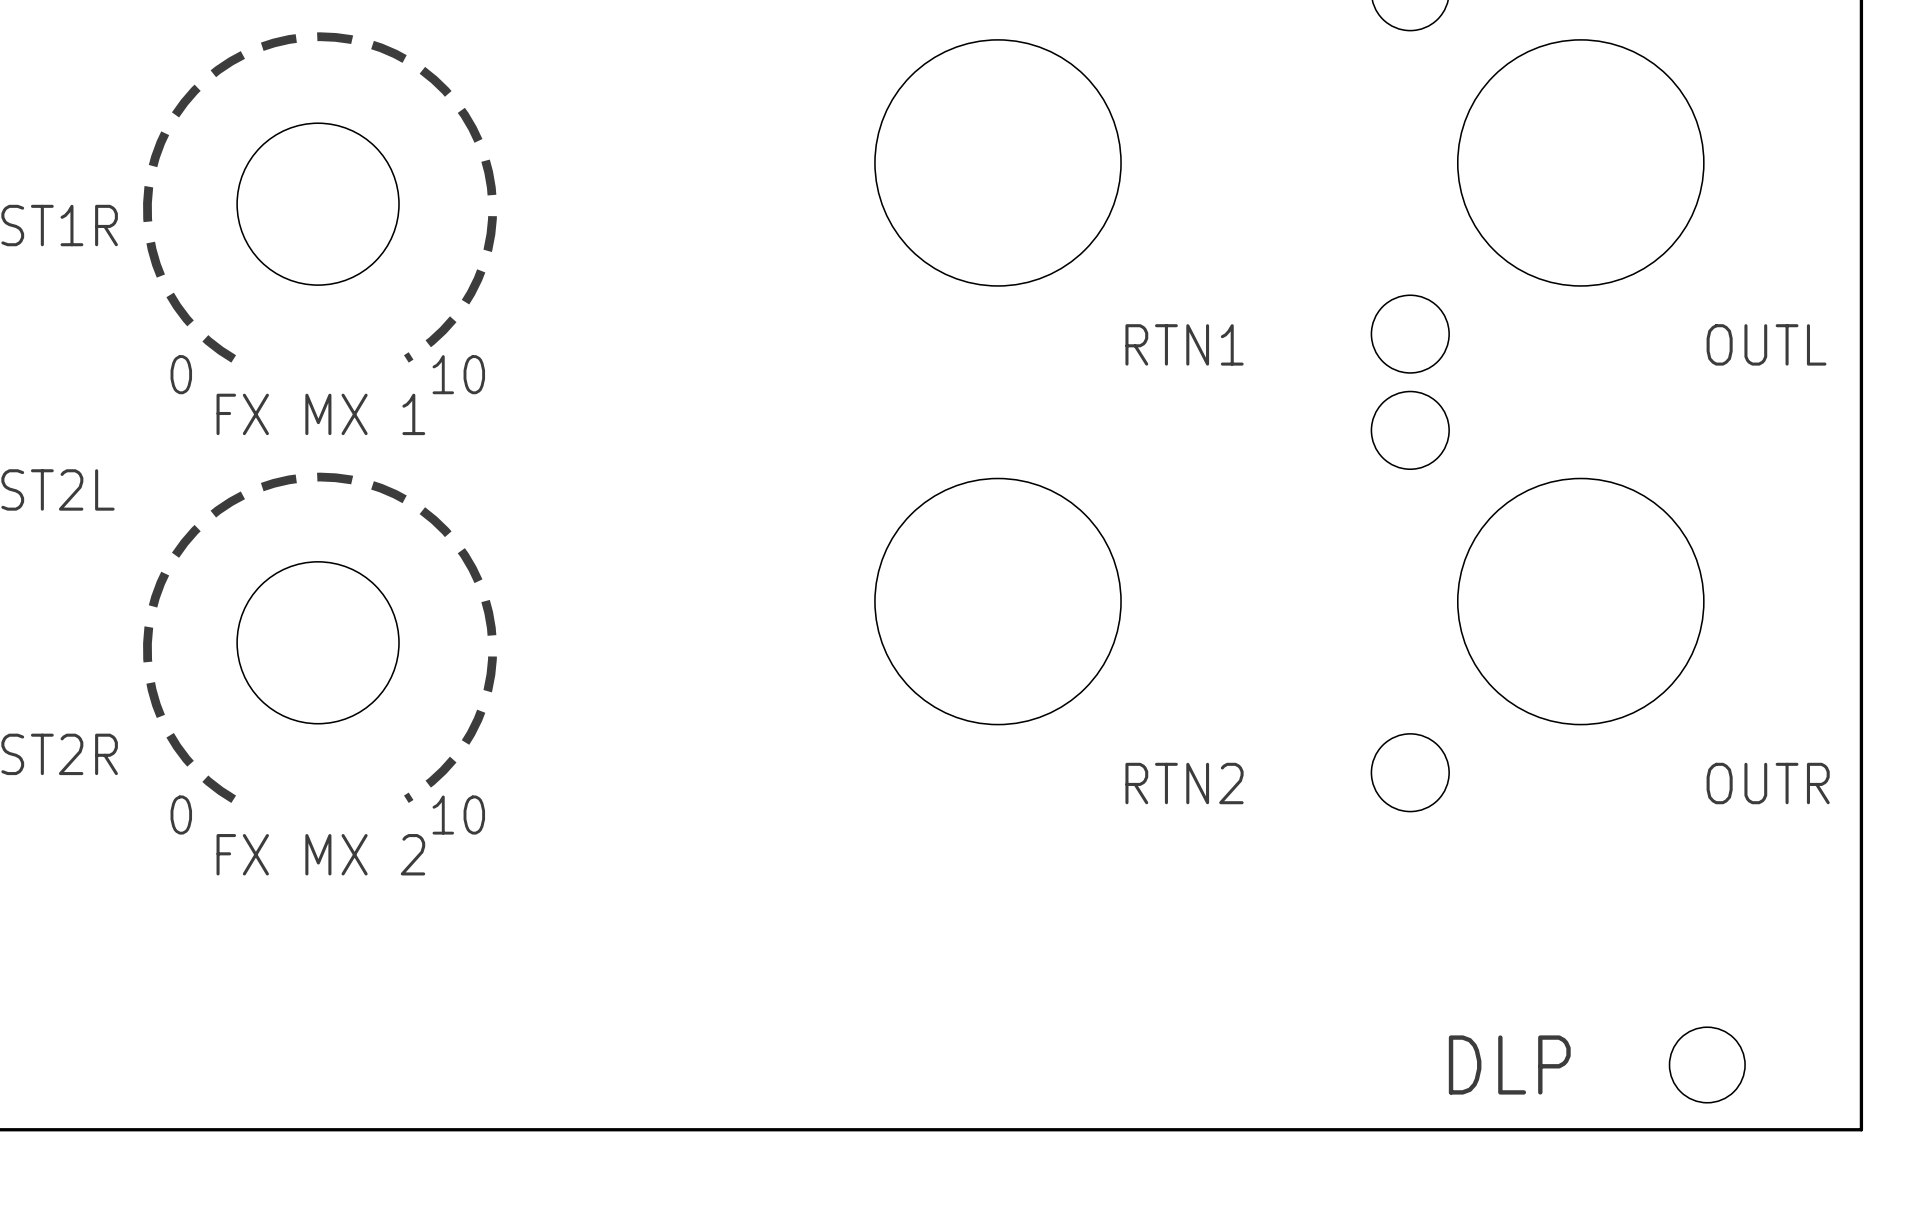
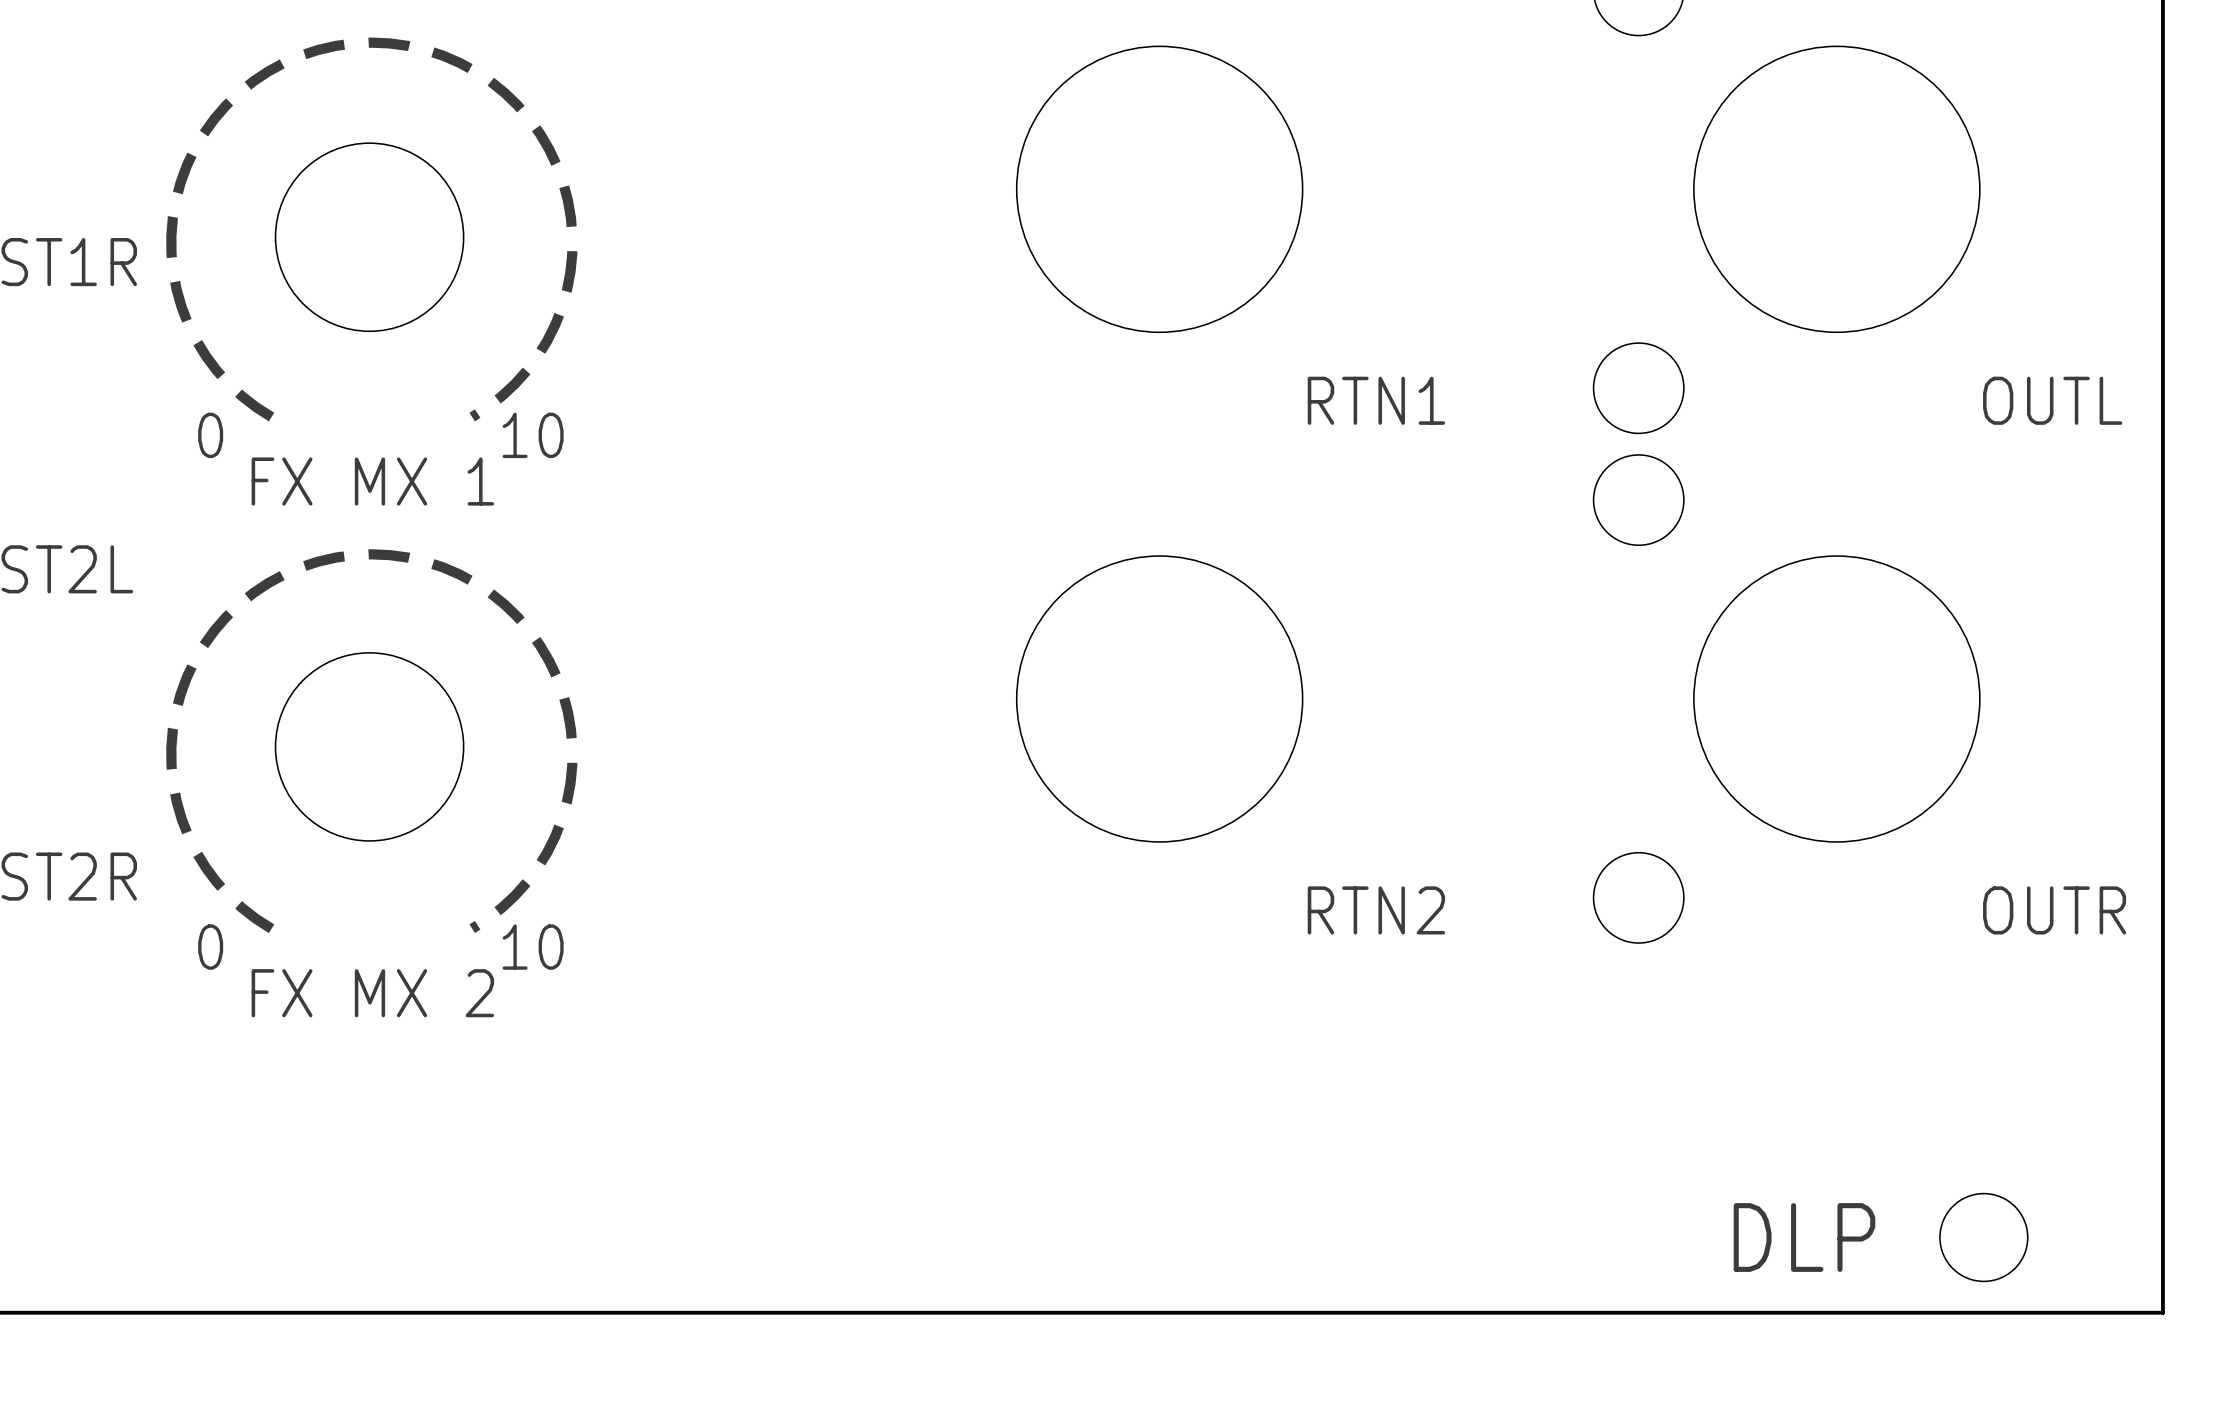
text position: DLP (1509, 1064) -> DLP (1804, 1237)

